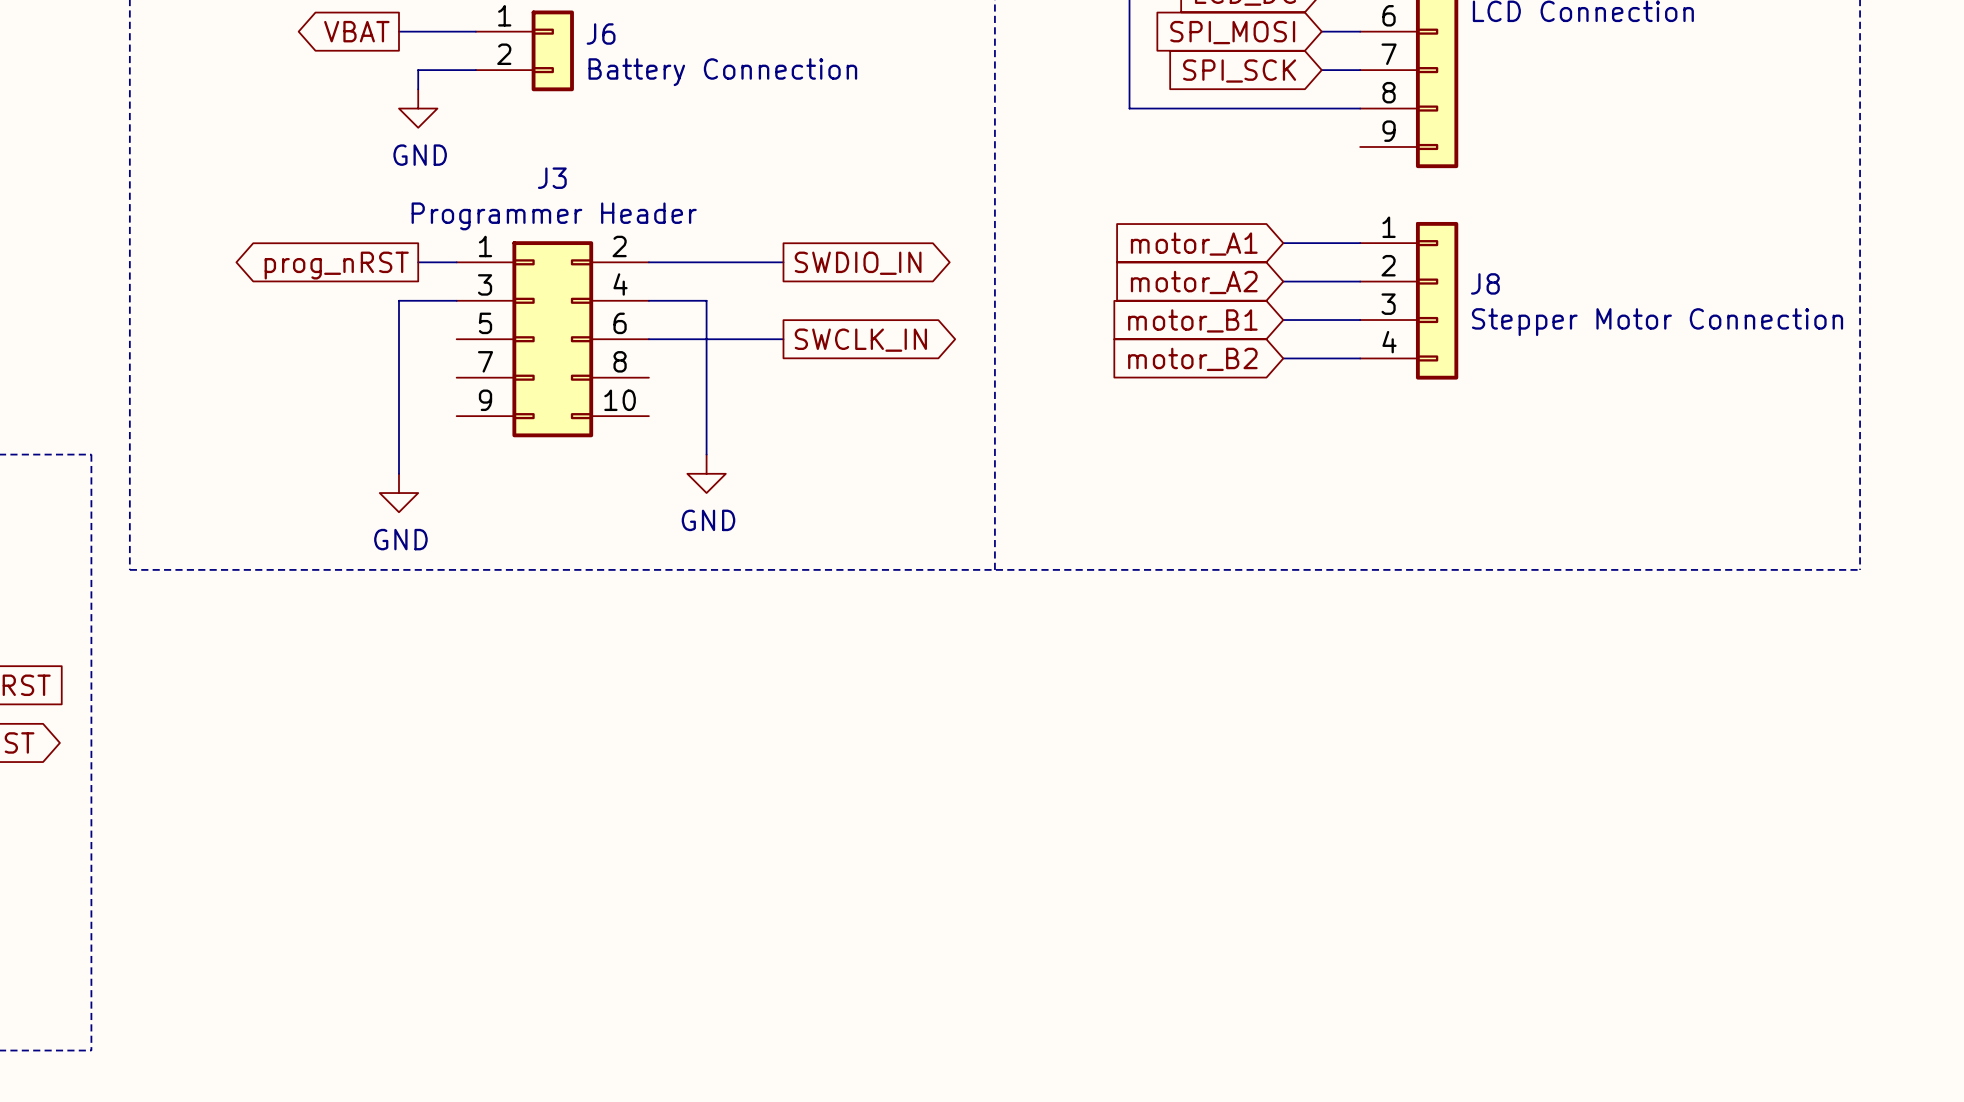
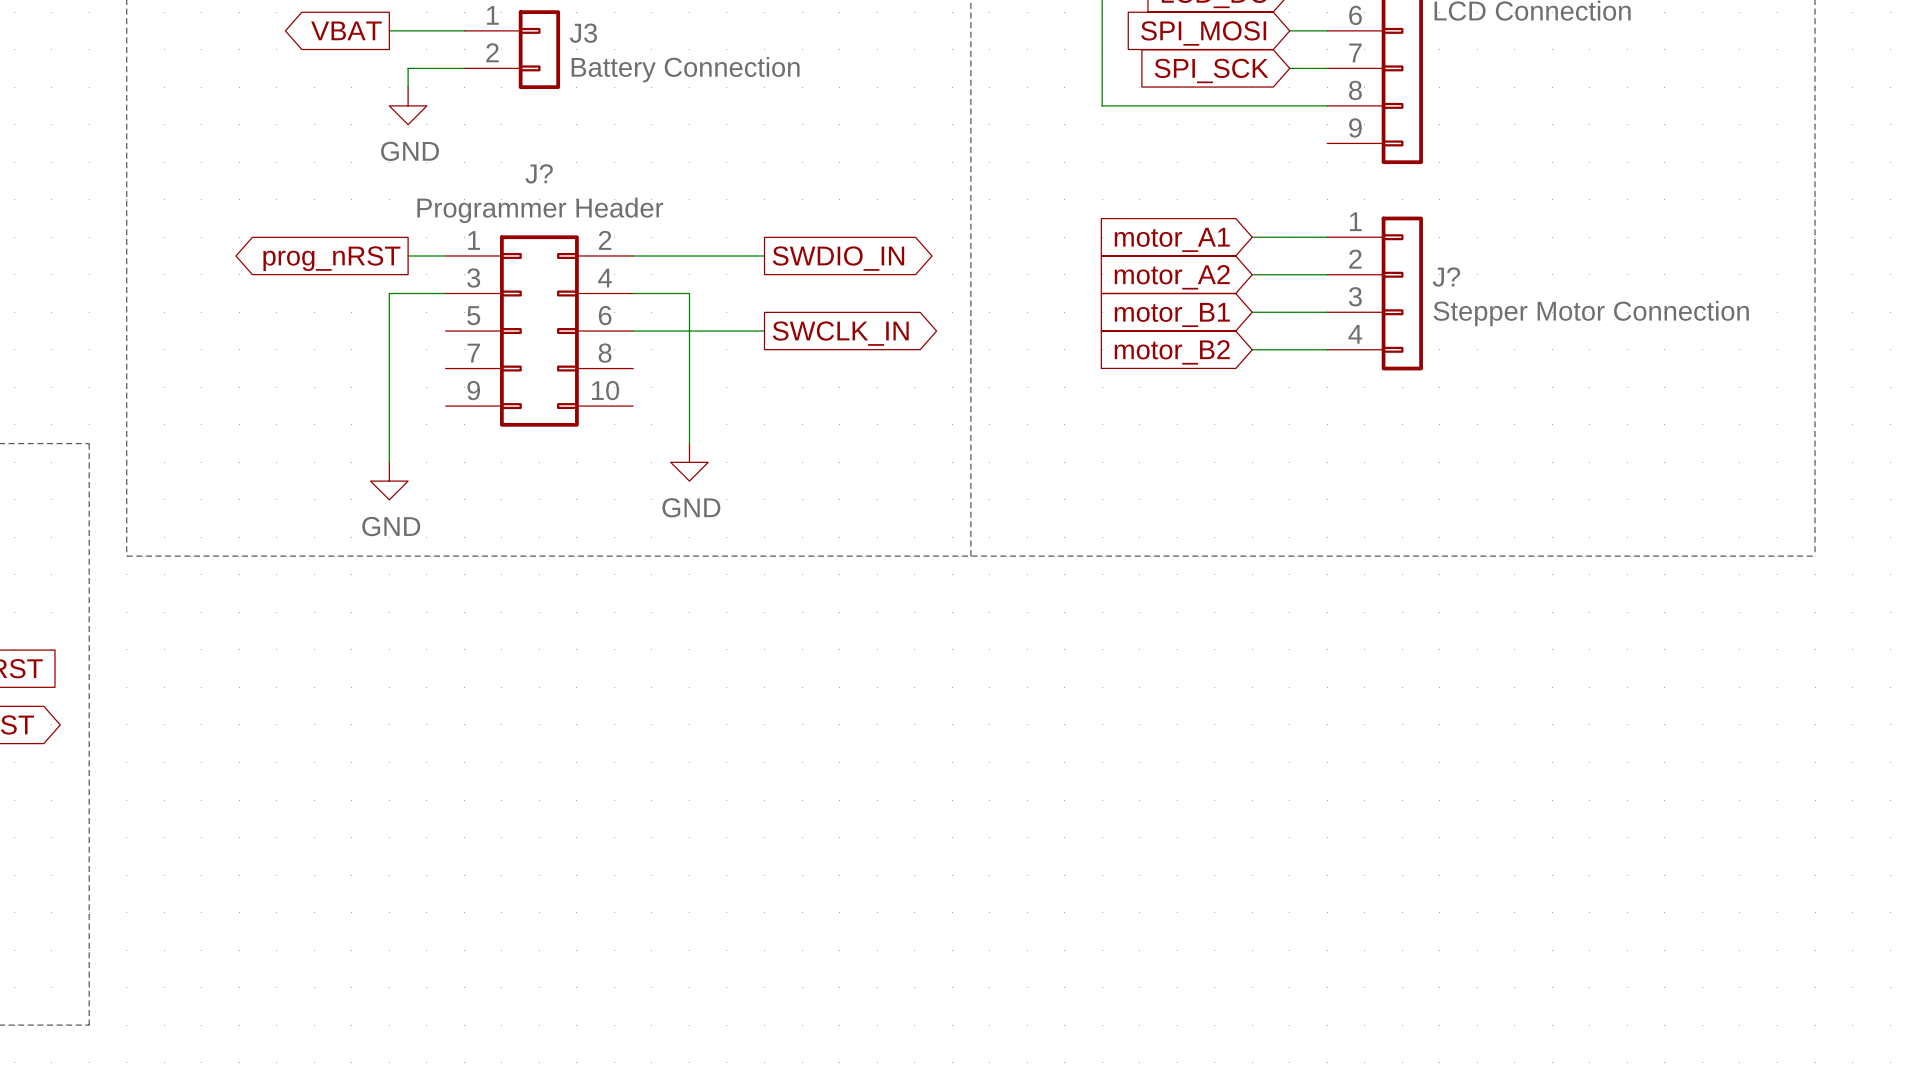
J6 name: J6 (601, 34) -> J3 (583, 33)
J3 name: J3 (552, 178) -> J? (539, 173)
J8 name: J8 (1485, 283) -> J? (1446, 277)

